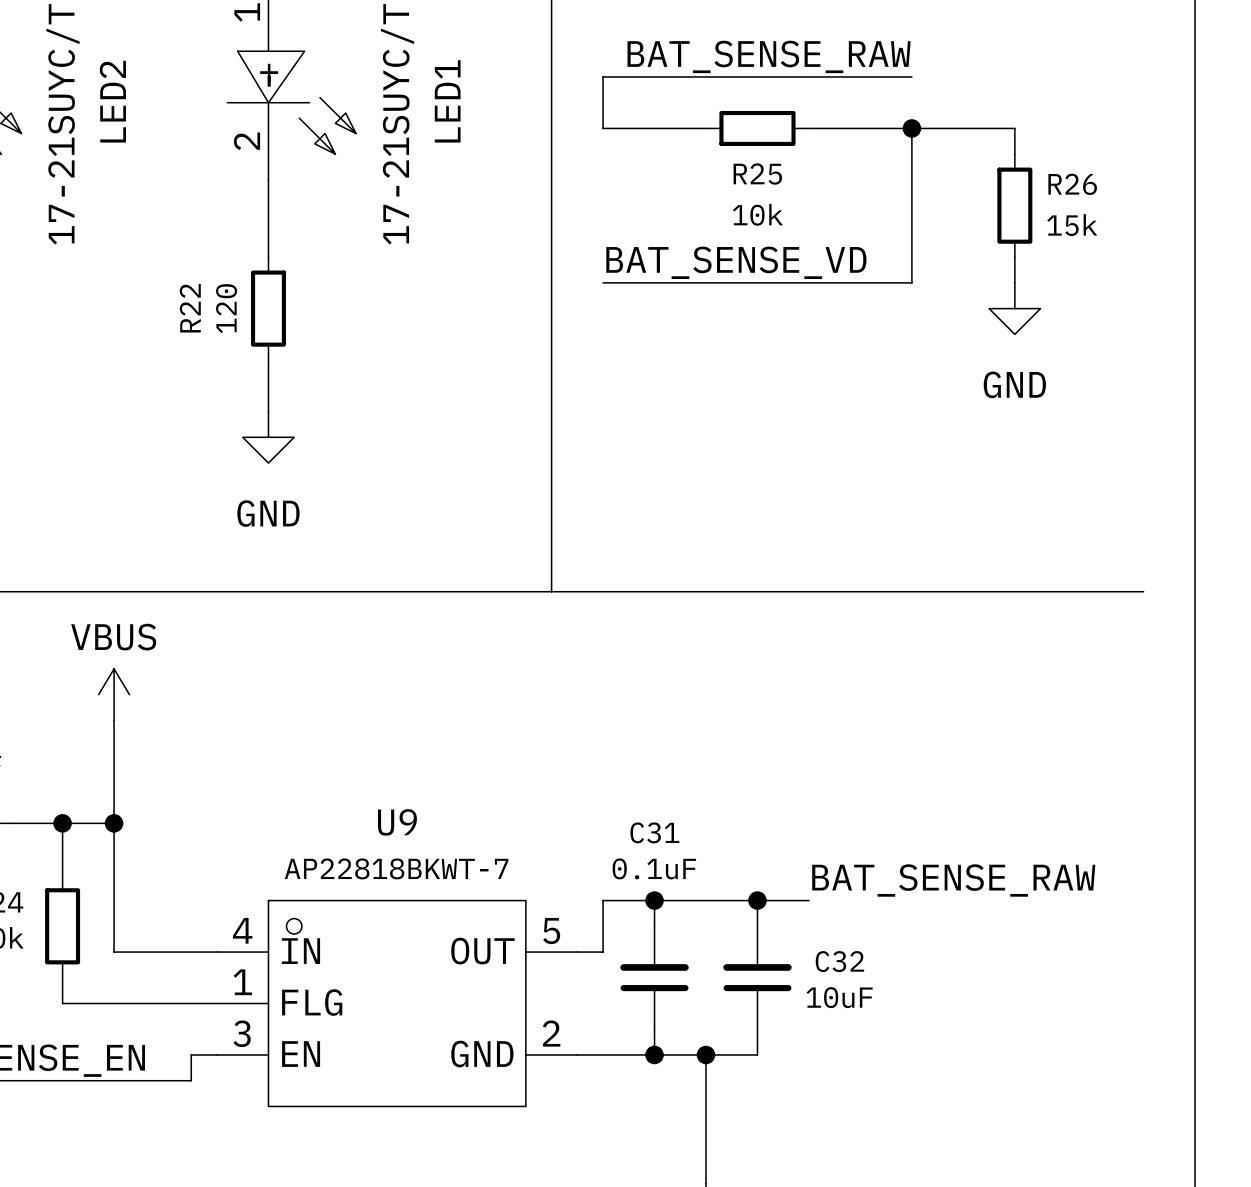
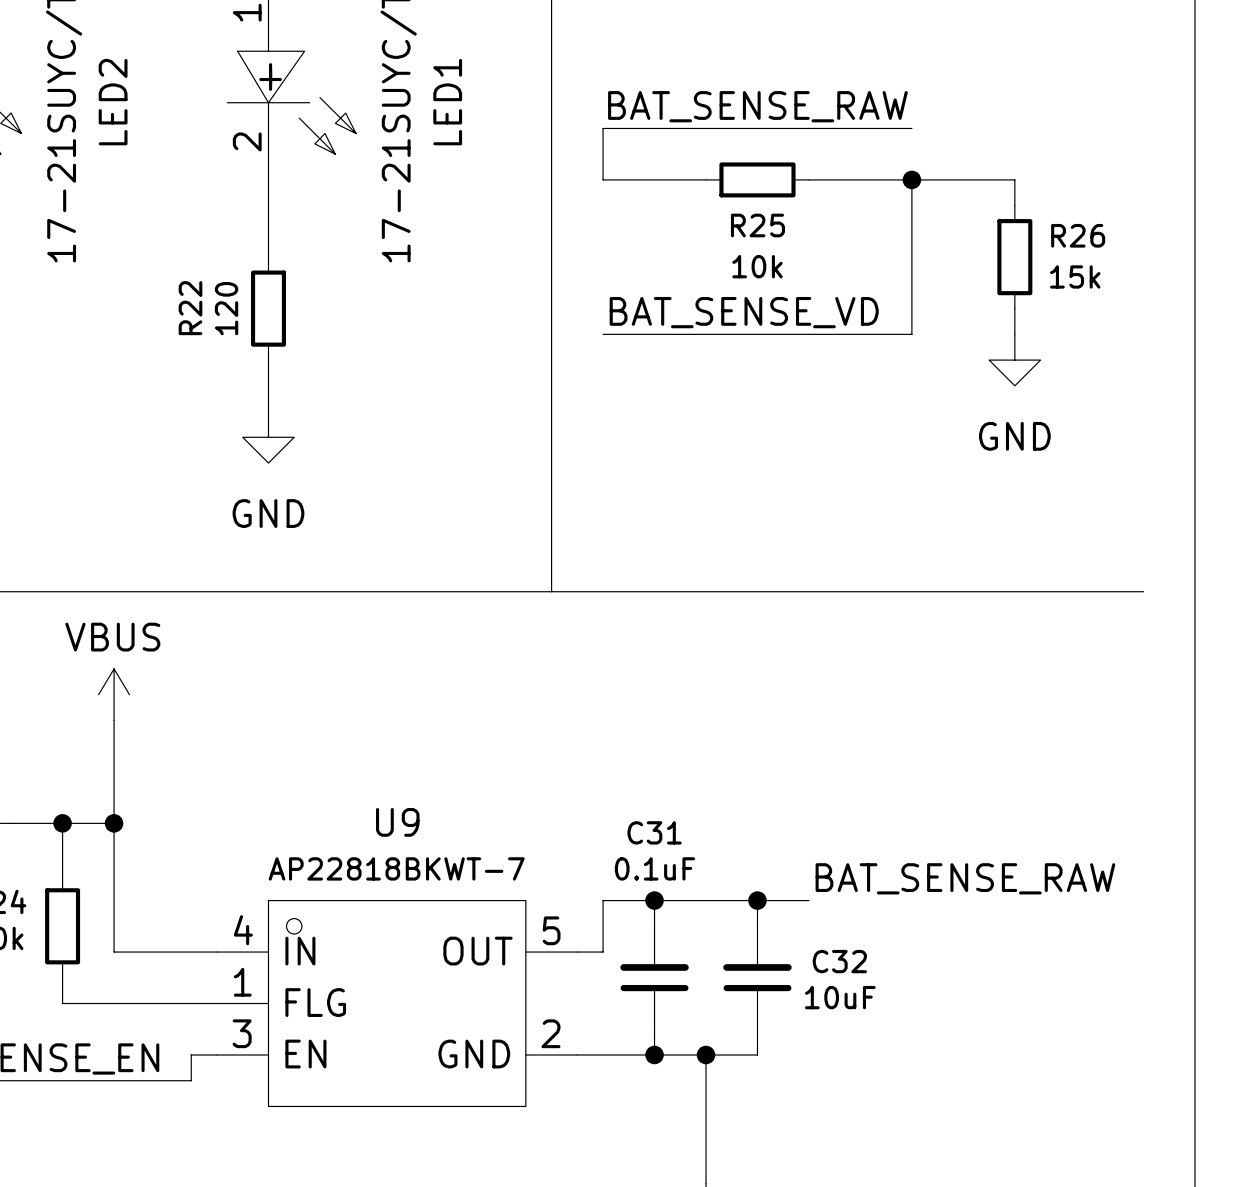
label position: BAT_SENSE_RAW (769, 56) -> BAT_SENSE_RAW (757, 106)
wire: (911, 76) (603, 76) (603, 128) -> (706, 179) (603, 179) (603, 128)
wire: none -> (706, 128) (808, 128)
R25 position: (757, 128) -> (757, 179)
junction position: (911, 128) -> (911, 179)
wire: (1014, 154) (1014, 128) (911, 128) (911, 179) -> none
wire: none -> (808, 179) (1014, 179) (1014, 205)
R26 position: (1014, 205) -> (1014, 257)
wire: (1014, 257) (1014, 282) -> (1014, 308) (1014, 334)
label position: BAT_SENSE_VD (736, 262) -> BAT_SENSE_VD (744, 312)
wire: (603, 282) (911, 282) -> (603, 334) (911, 334) (911, 282)
power symbol position: GND (1014, 308) -> GND (1014, 360)

